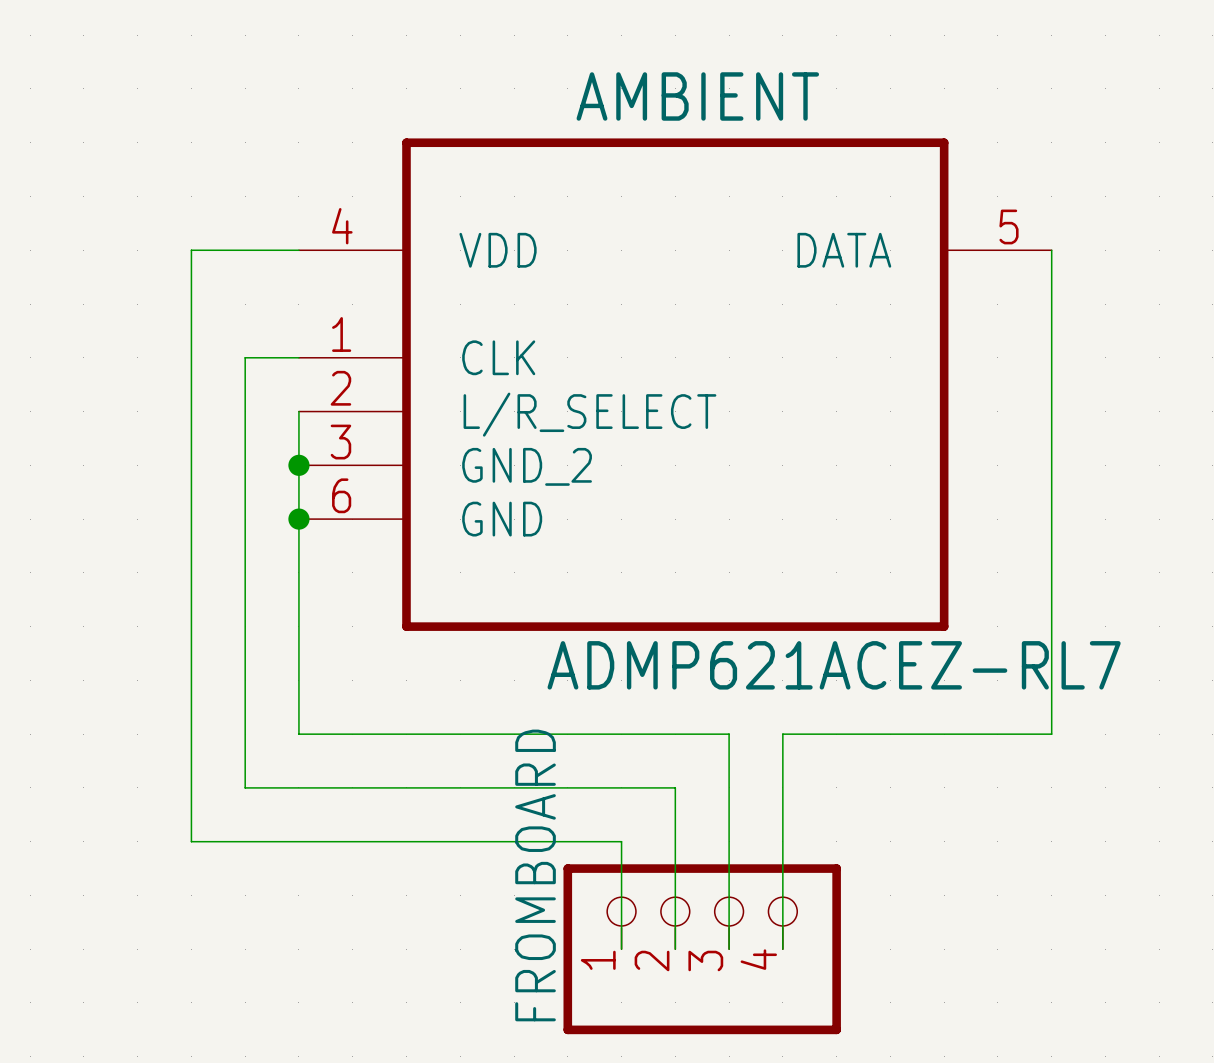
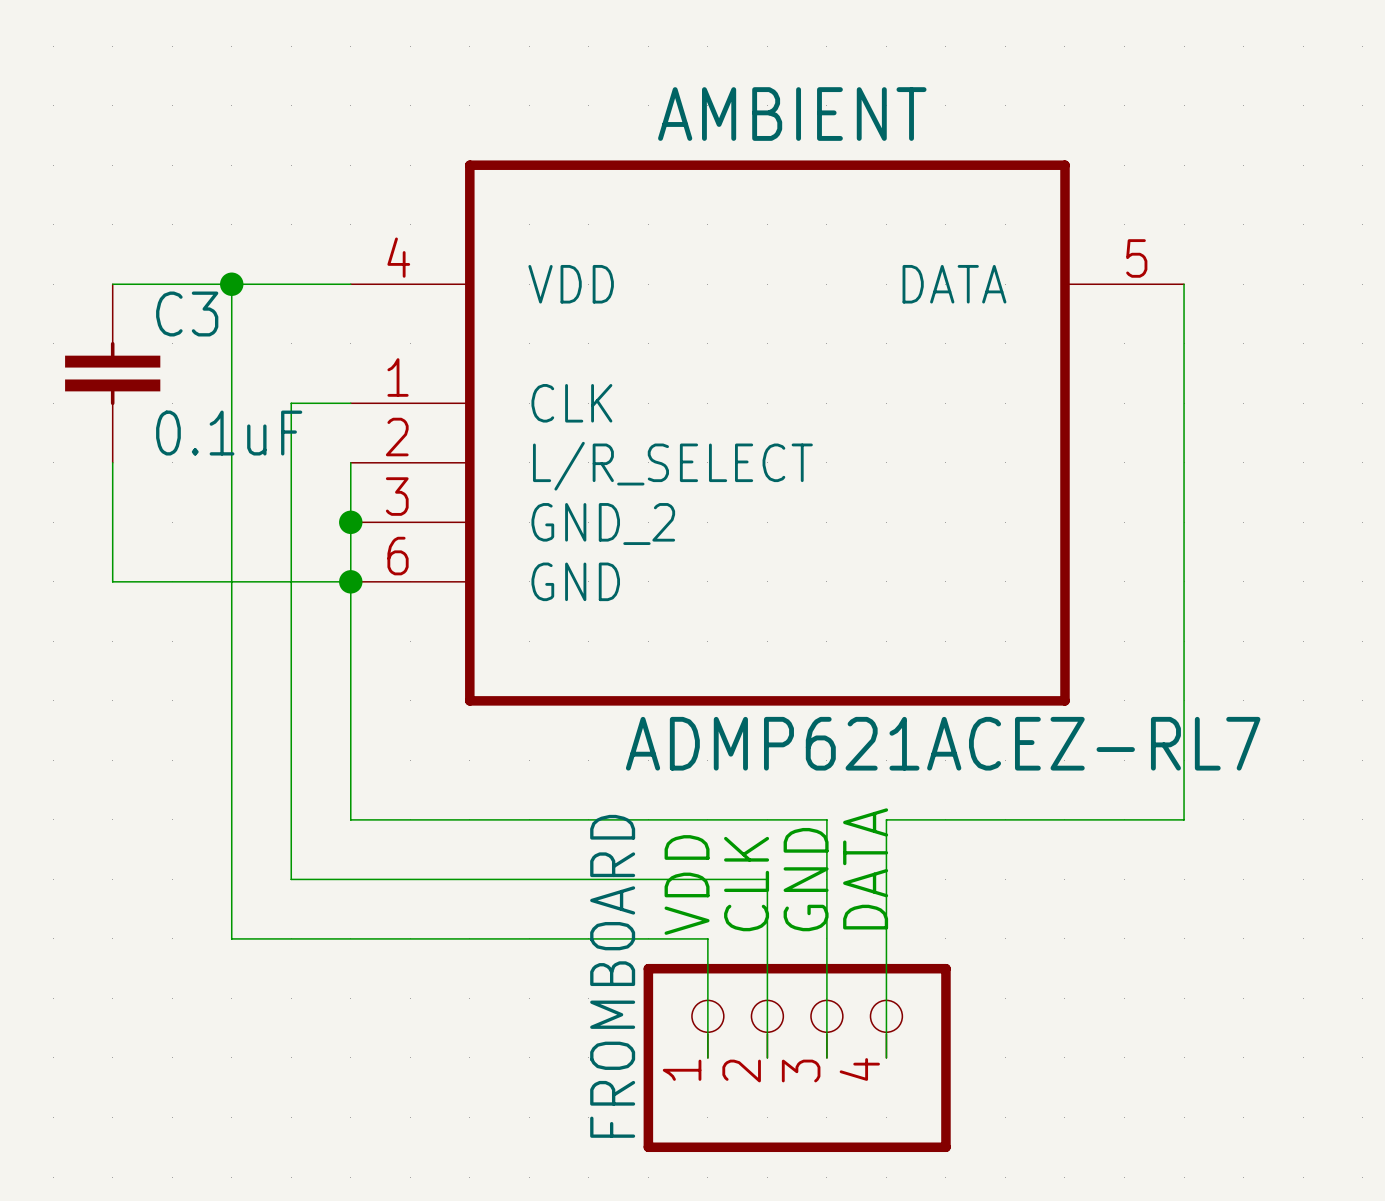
wire: none -> (112, 284) (231, 284)
junction: none -> (231, 284)
C3: none -> 0.1uF (112, 373)
wire: none -> (112, 462) (112, 581) (350, 581)
text: none -> DATA (865, 868)
text: none -> GND (806, 879)
text: none -> VDD (687, 884)
text: none -> CLK (746, 884)

